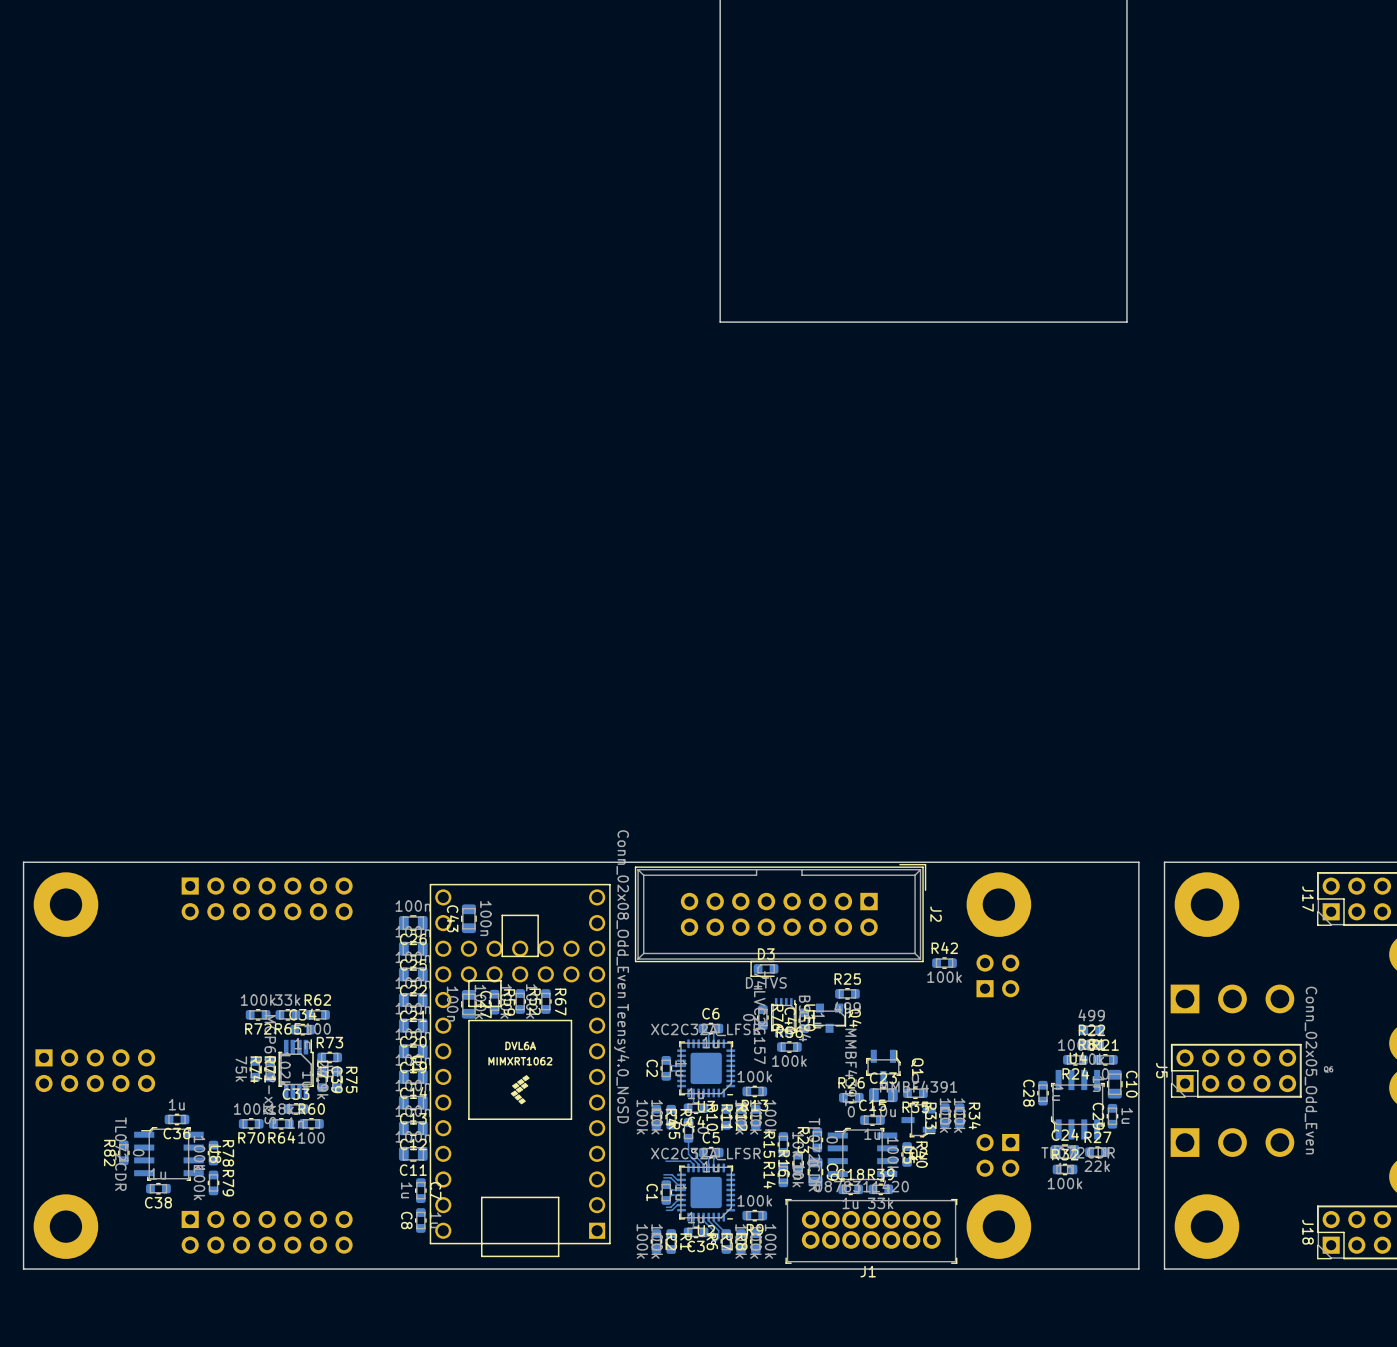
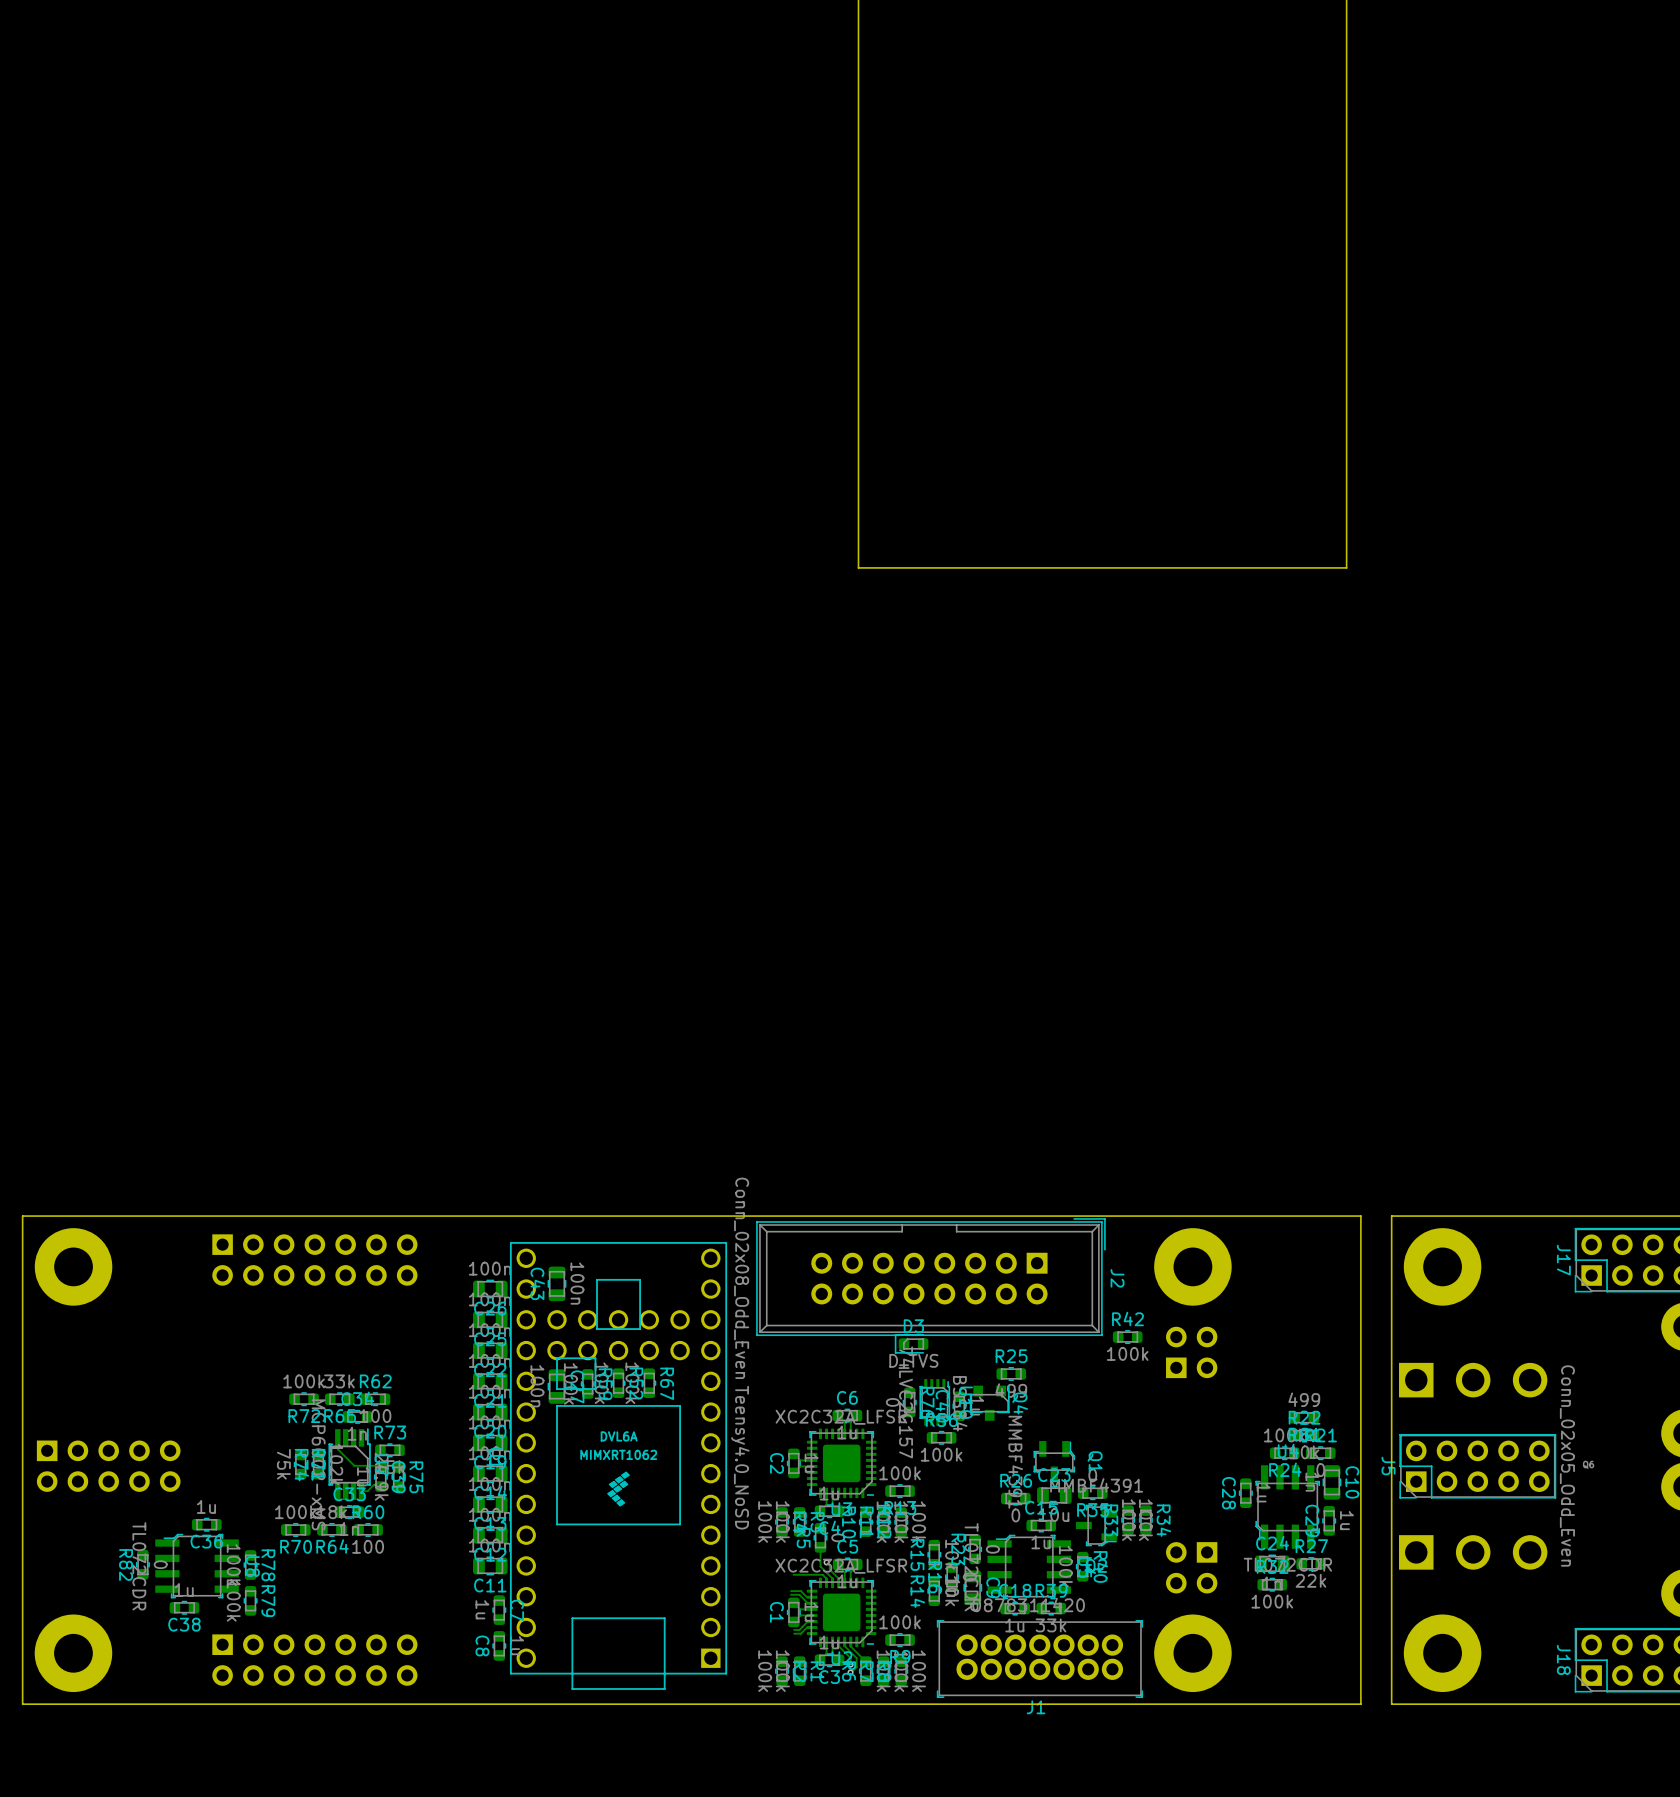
track: none -> (337, 1437) (337, 1449) (354, 1465) (380, 1465)
track: none -> (380, 1484) (373, 1484) (367, 1491) (361, 1491)

